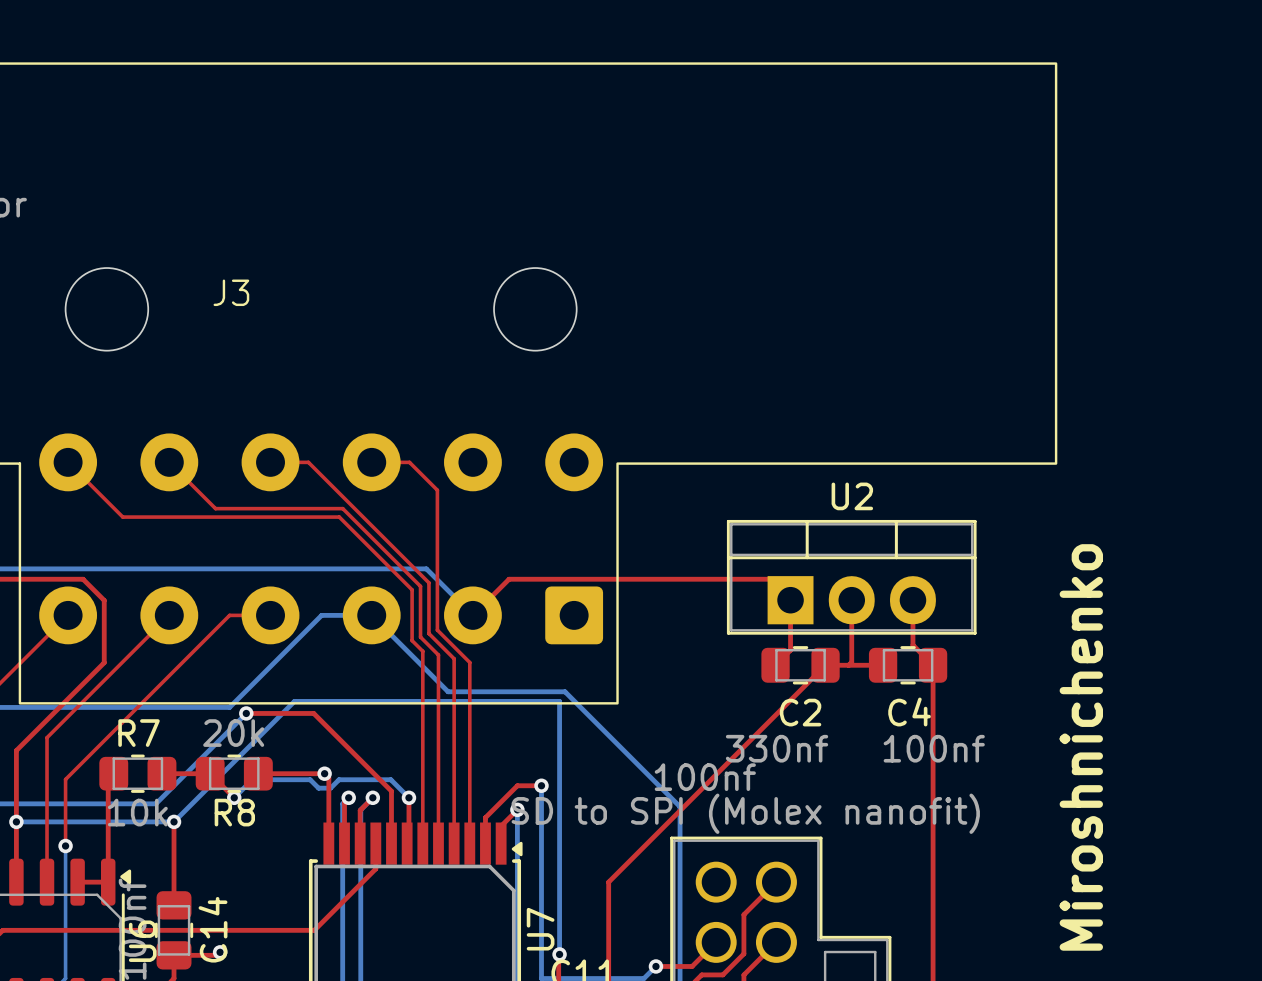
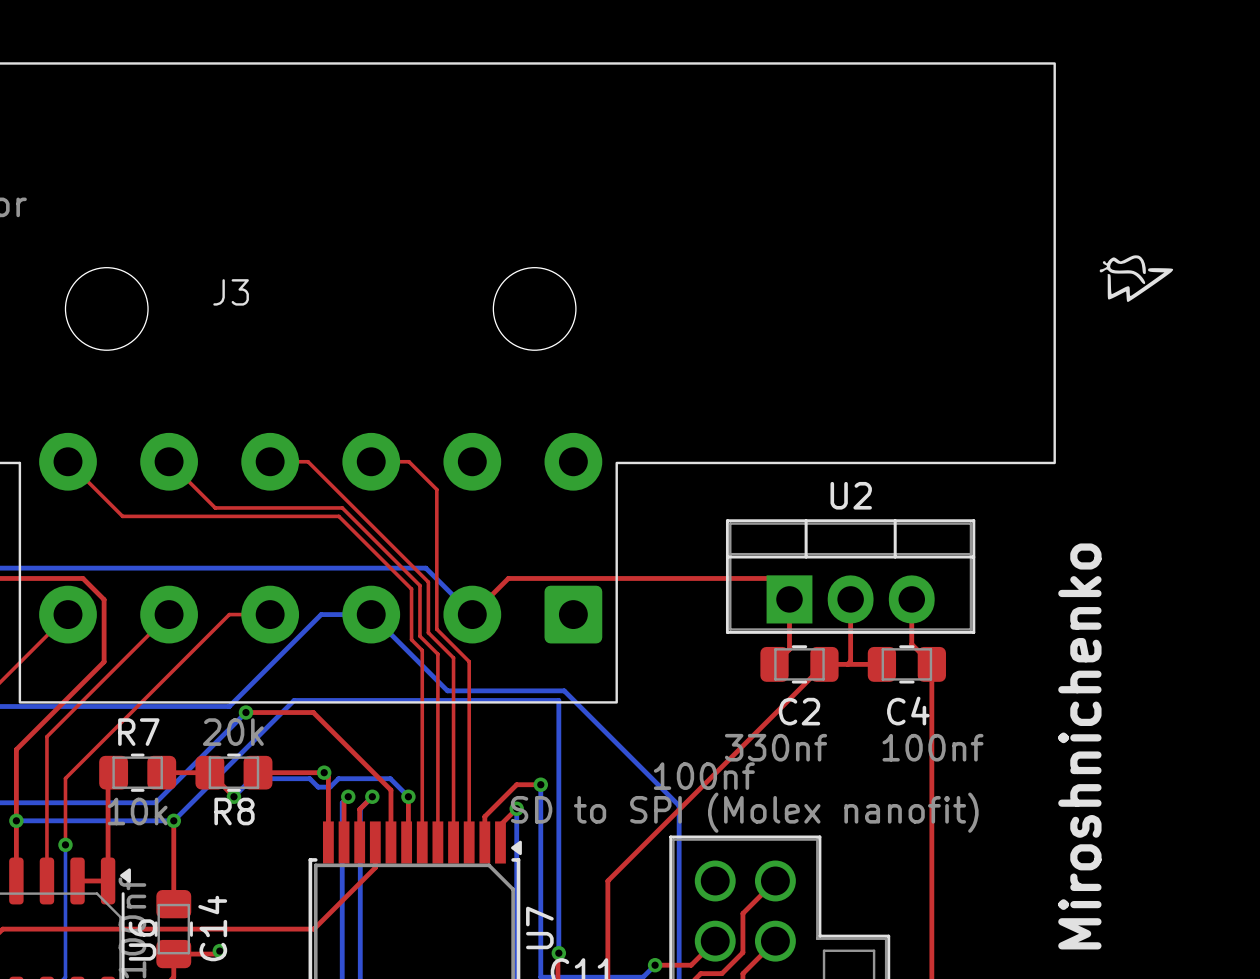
drawing: none -> [1099, 255, 1174, 303]

